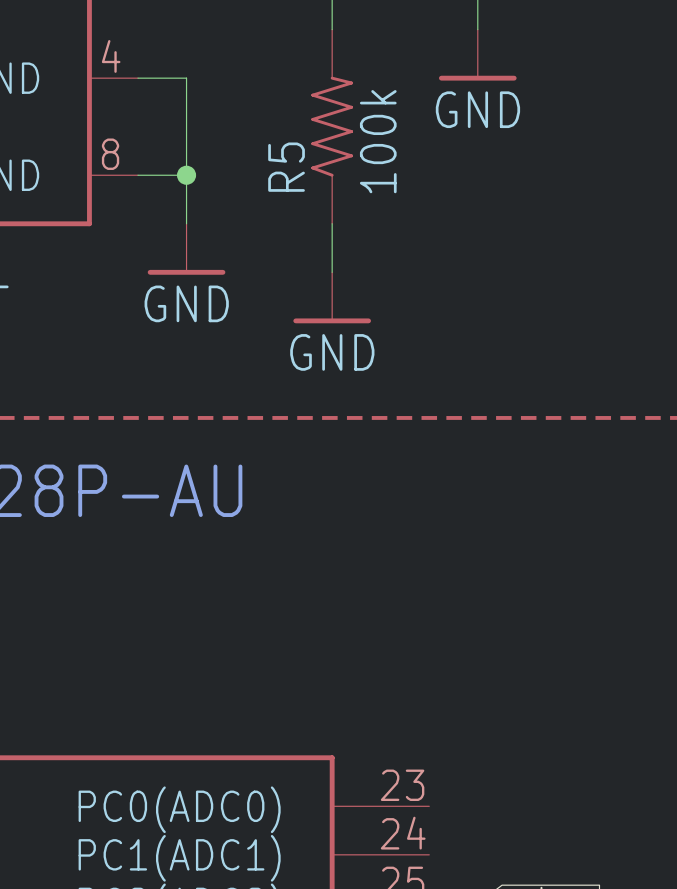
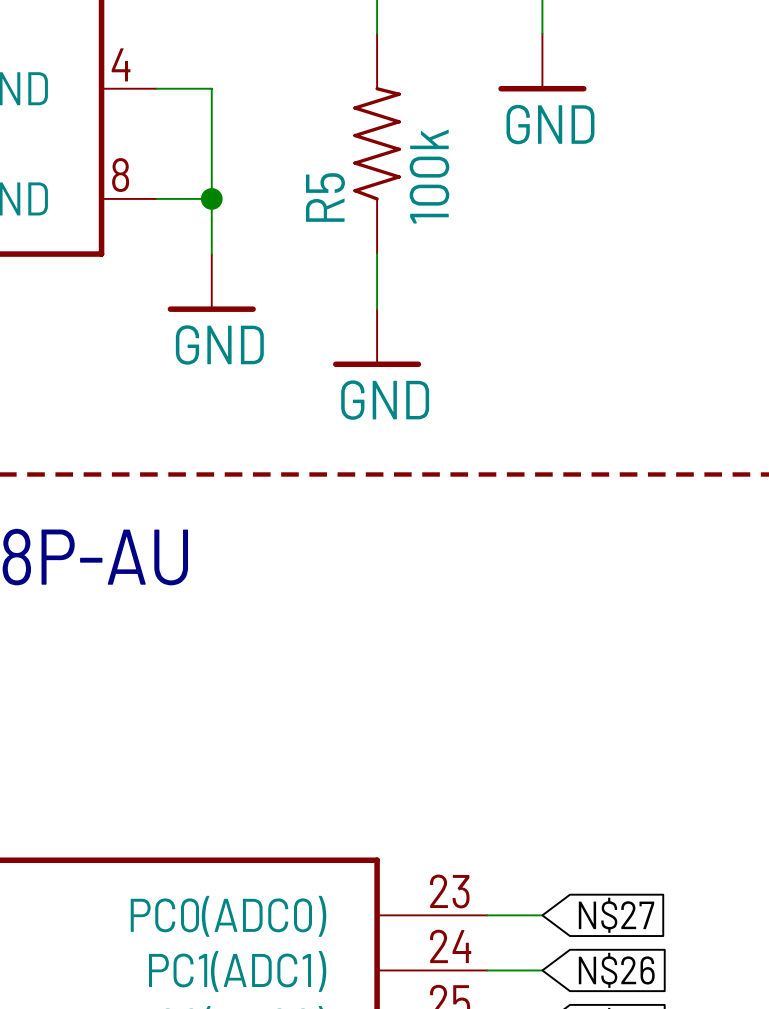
wire: none -> (487, 915) (542, 915)
global label: none -> N$27 (616, 915)
wire: none -> (487, 970) (542, 970)
global label: none -> N$26 (616, 970)

